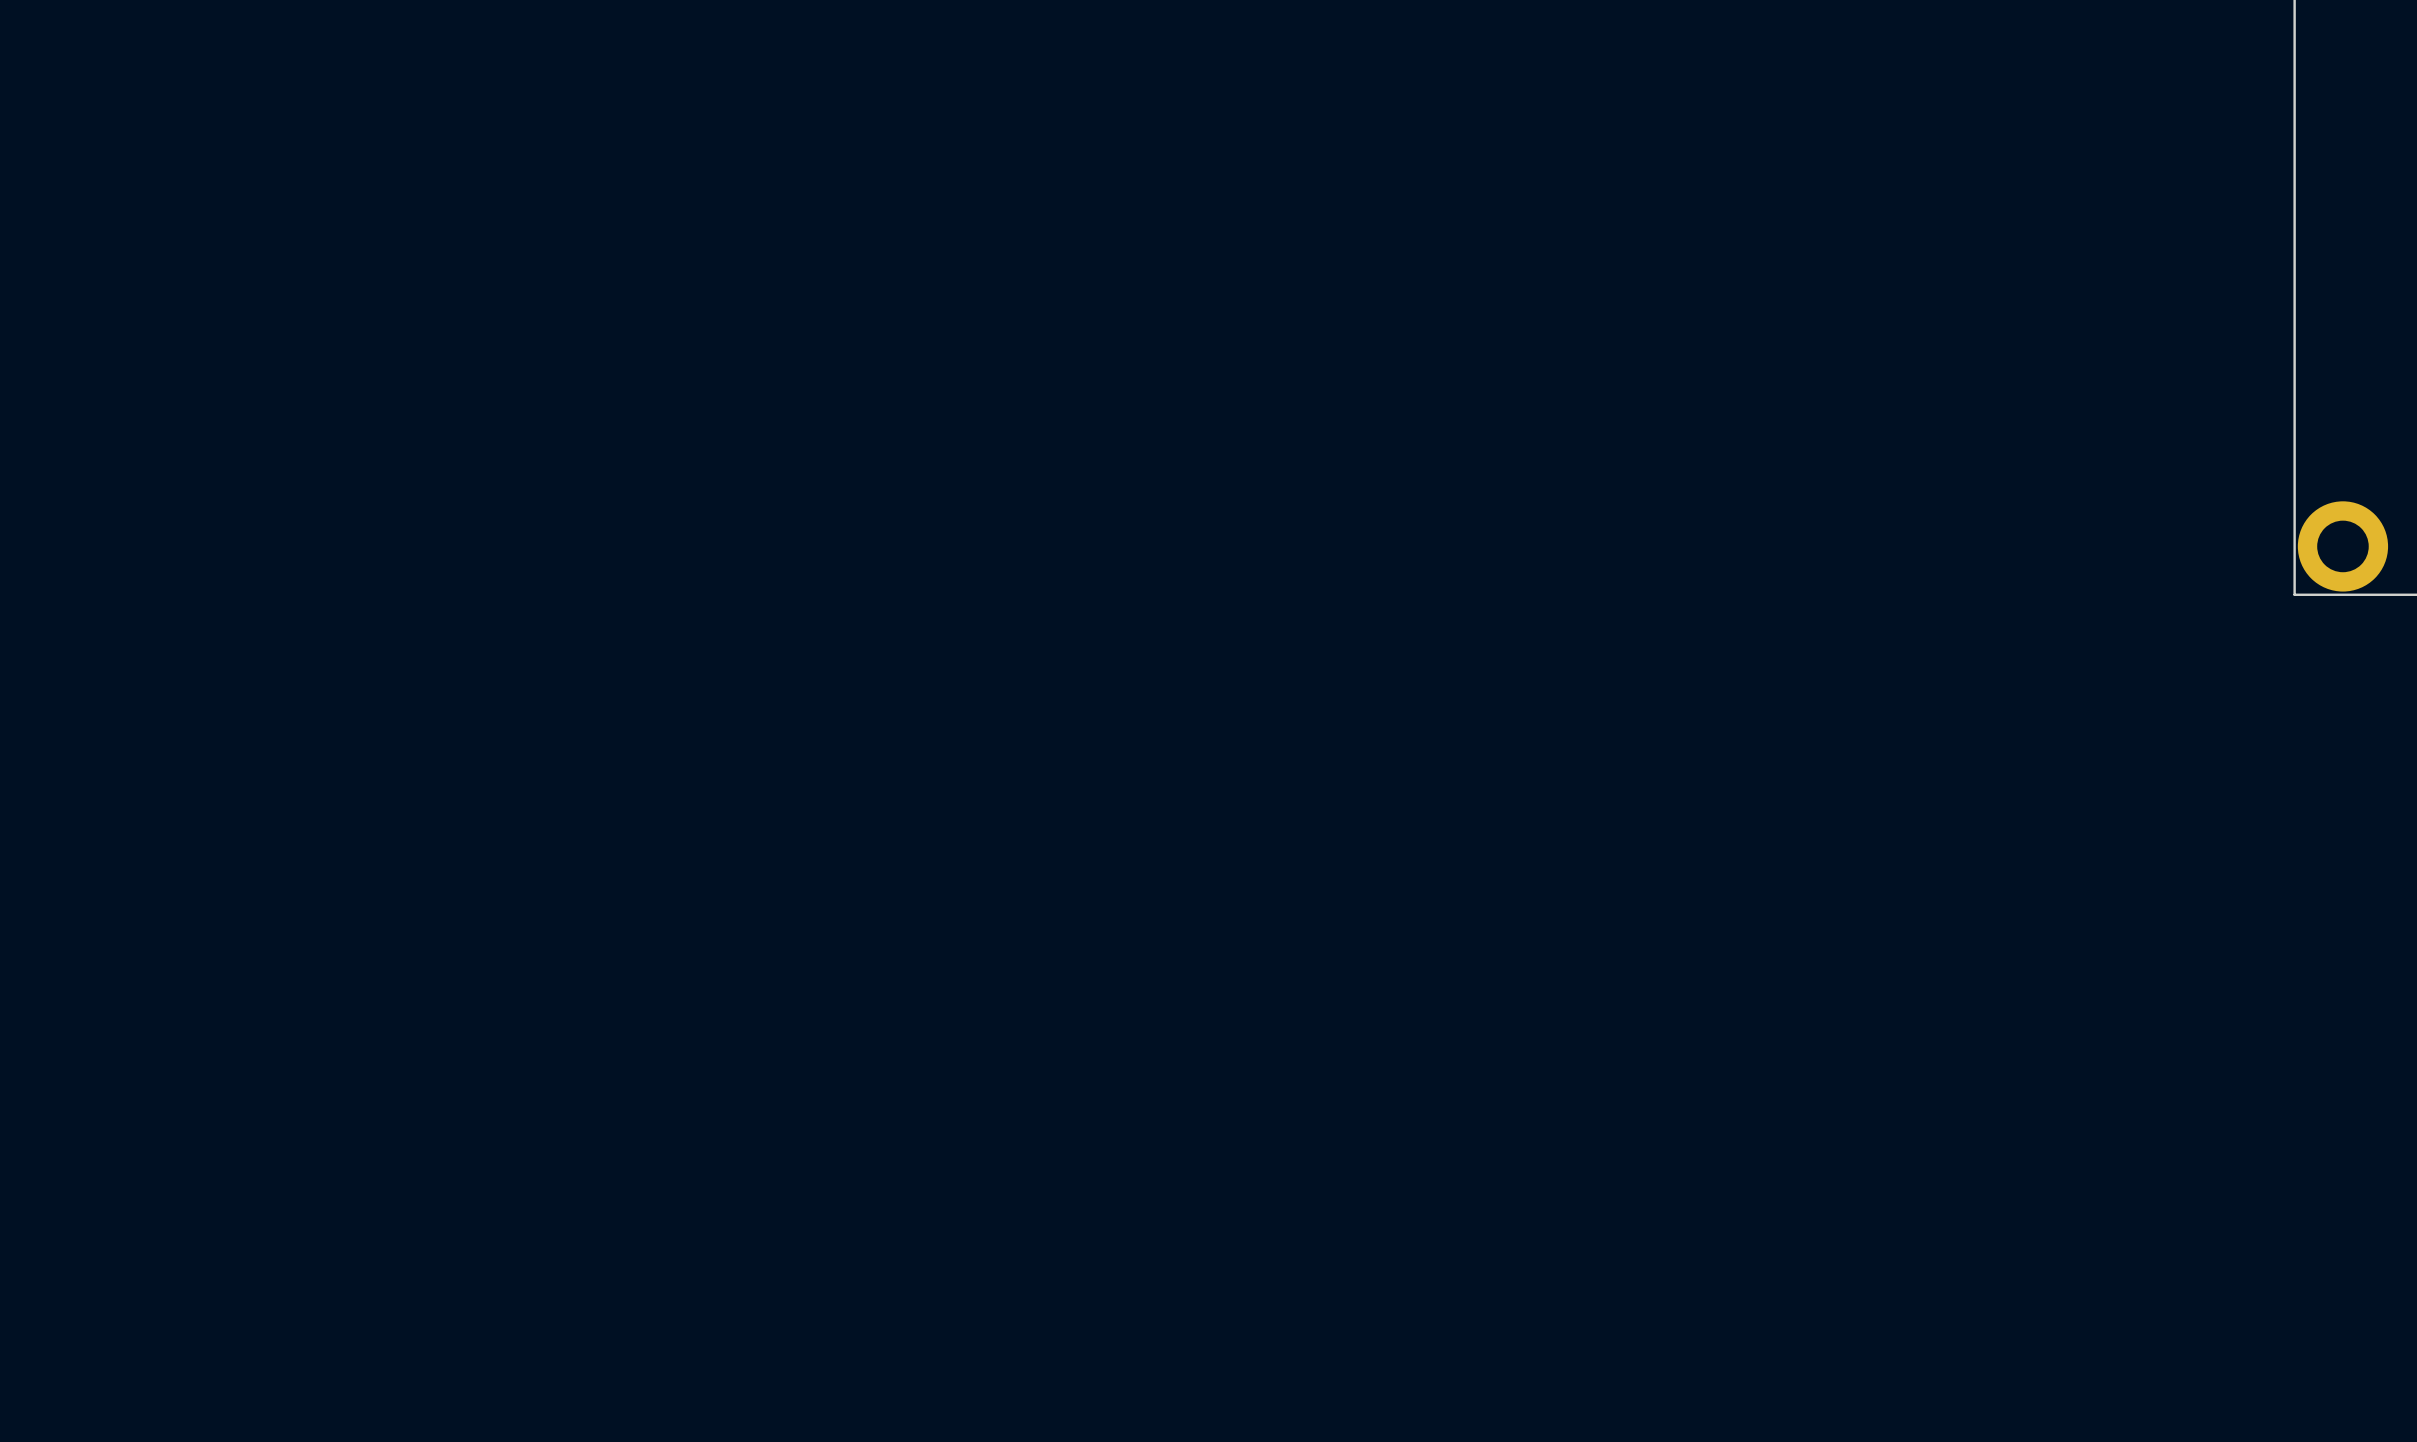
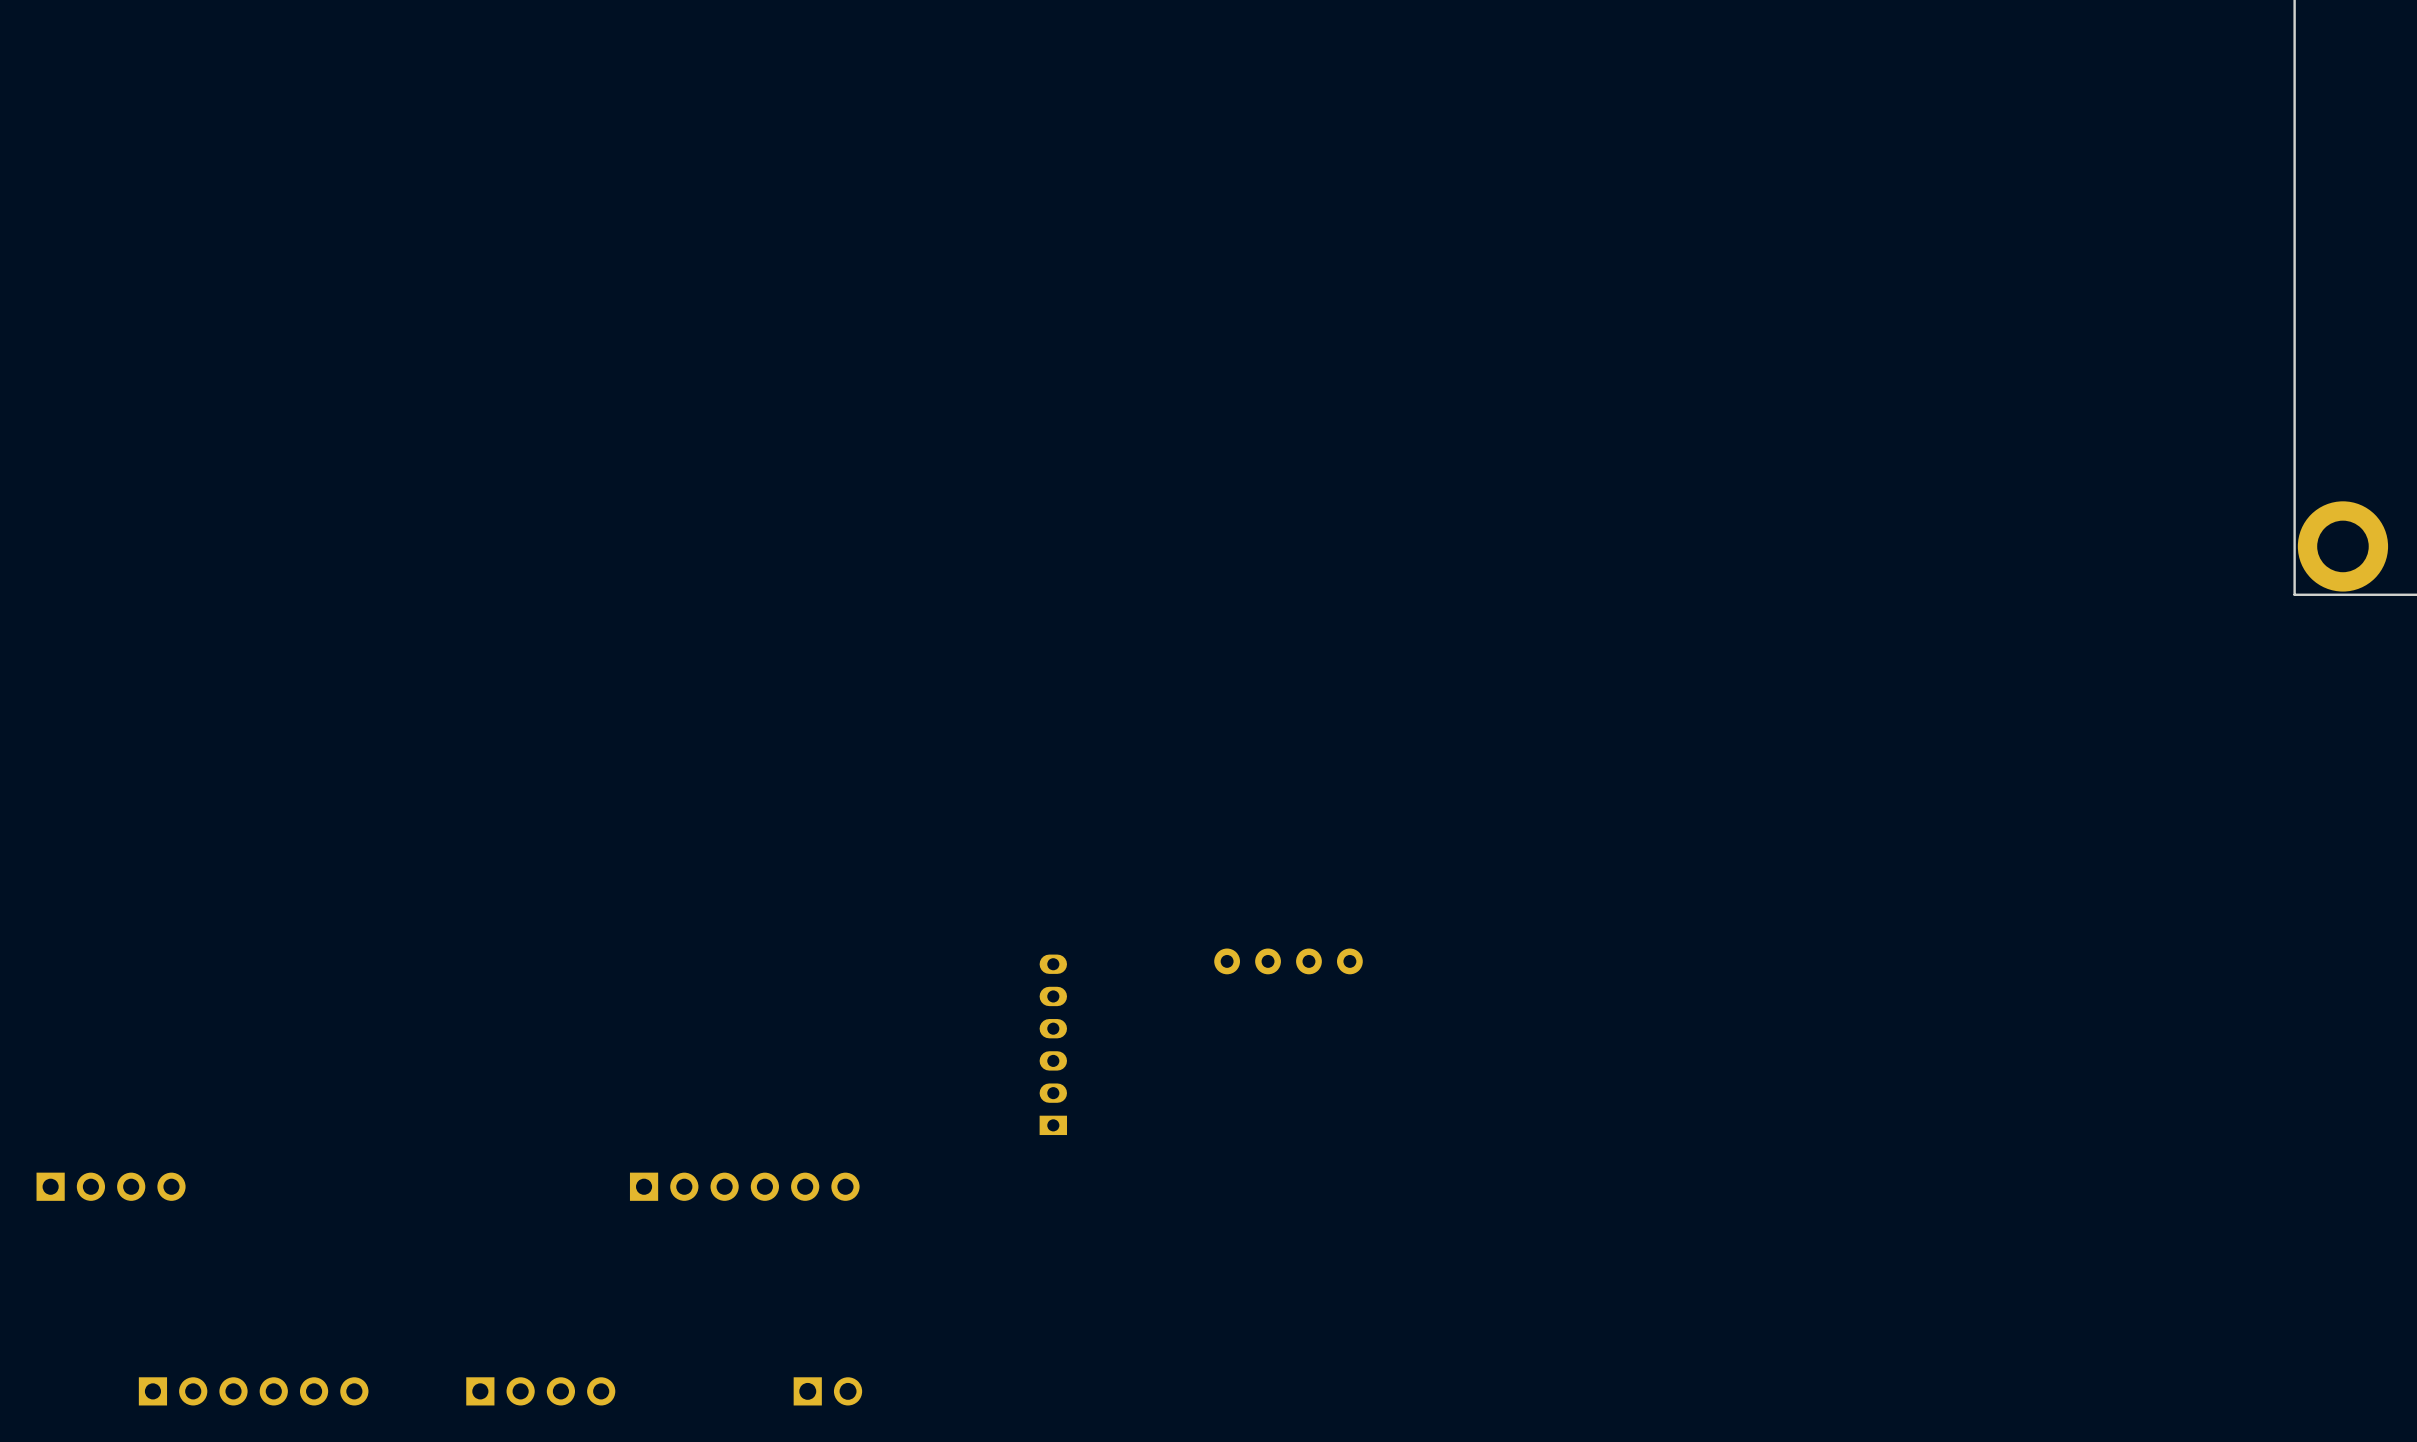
part: none -> (1288, 961)
part: none -> (1053, 1044)
part: none -> (111, 1186)
part: none -> (744, 1186)
part: none -> (253, 1391)
part: none -> (540, 1391)
part: none -> (827, 1391)

